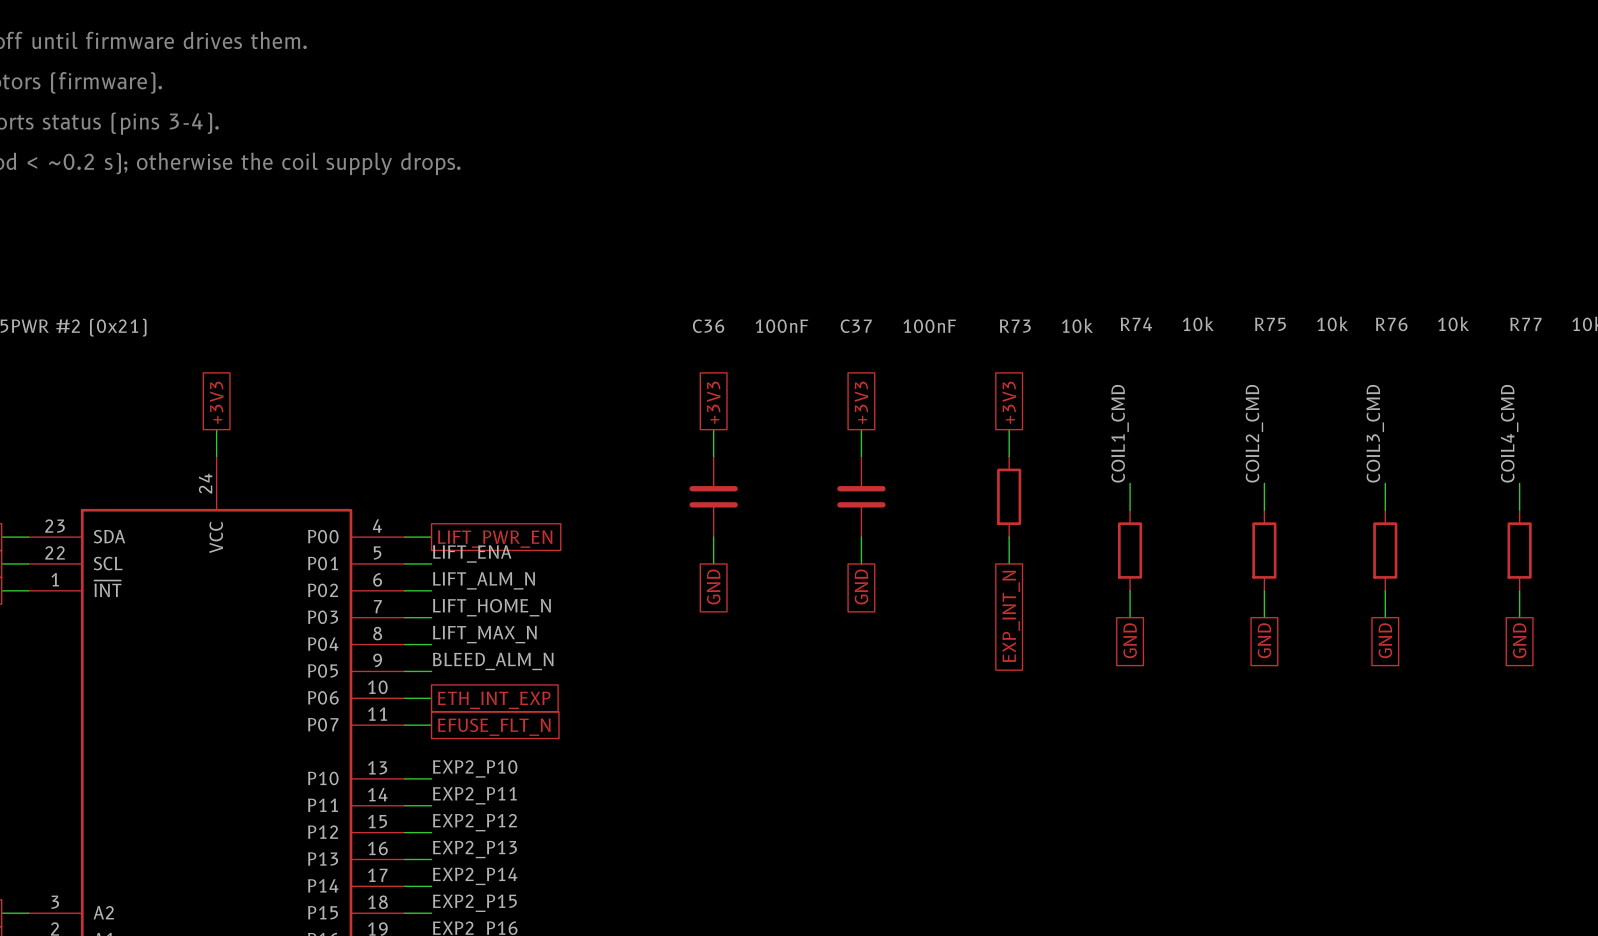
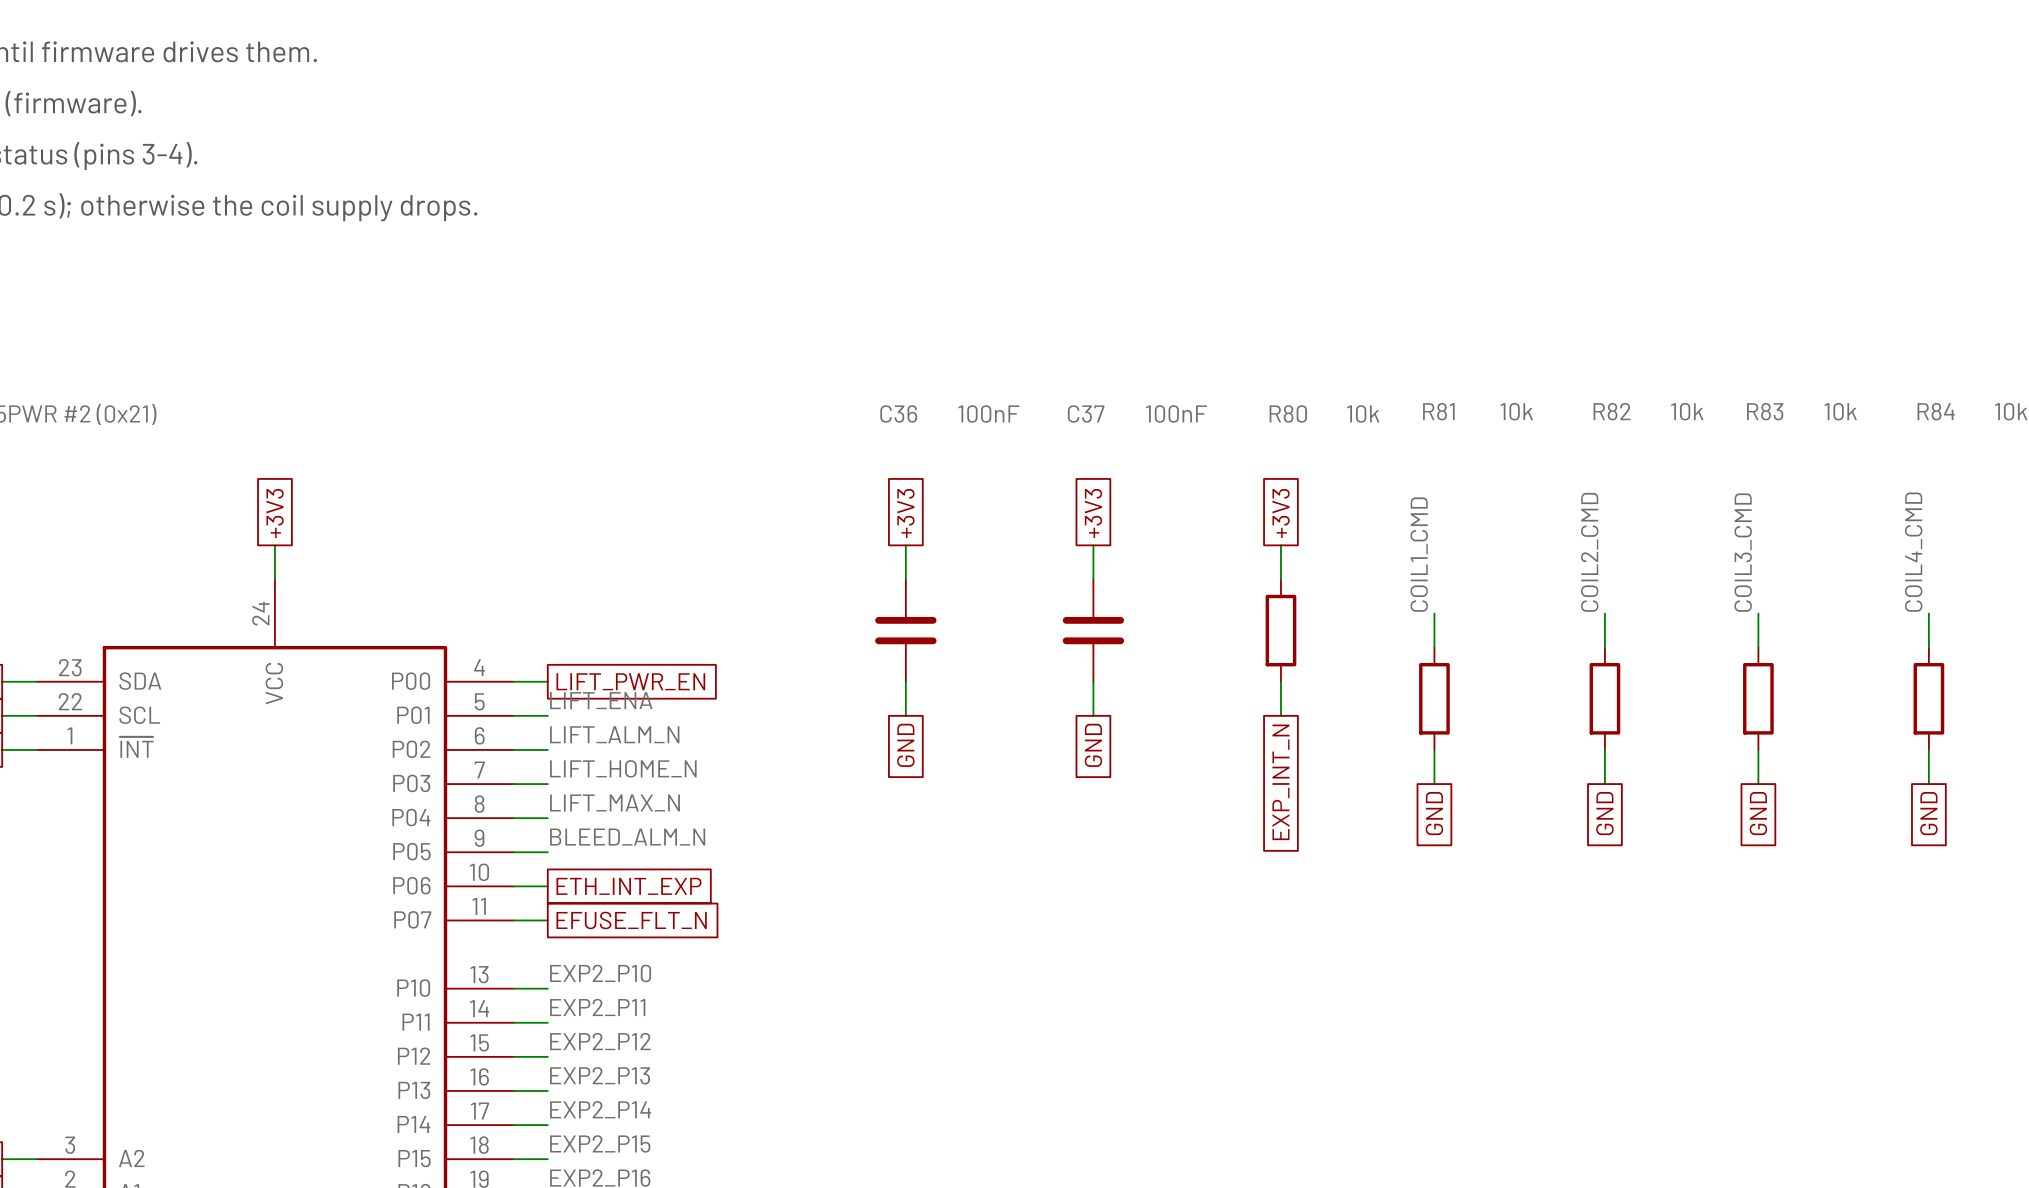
R74 name: R74 (1136, 324) -> R81 (1438, 411)
R75 name: R75 (1270, 324) -> R82 (1612, 411)
R76 name: R76 (1391, 324) -> R83 (1765, 411)
R77 name: R77 (1525, 324) -> R84 (1936, 411)
R73 name: R73 (1015, 326) -> R80 (1288, 413)

